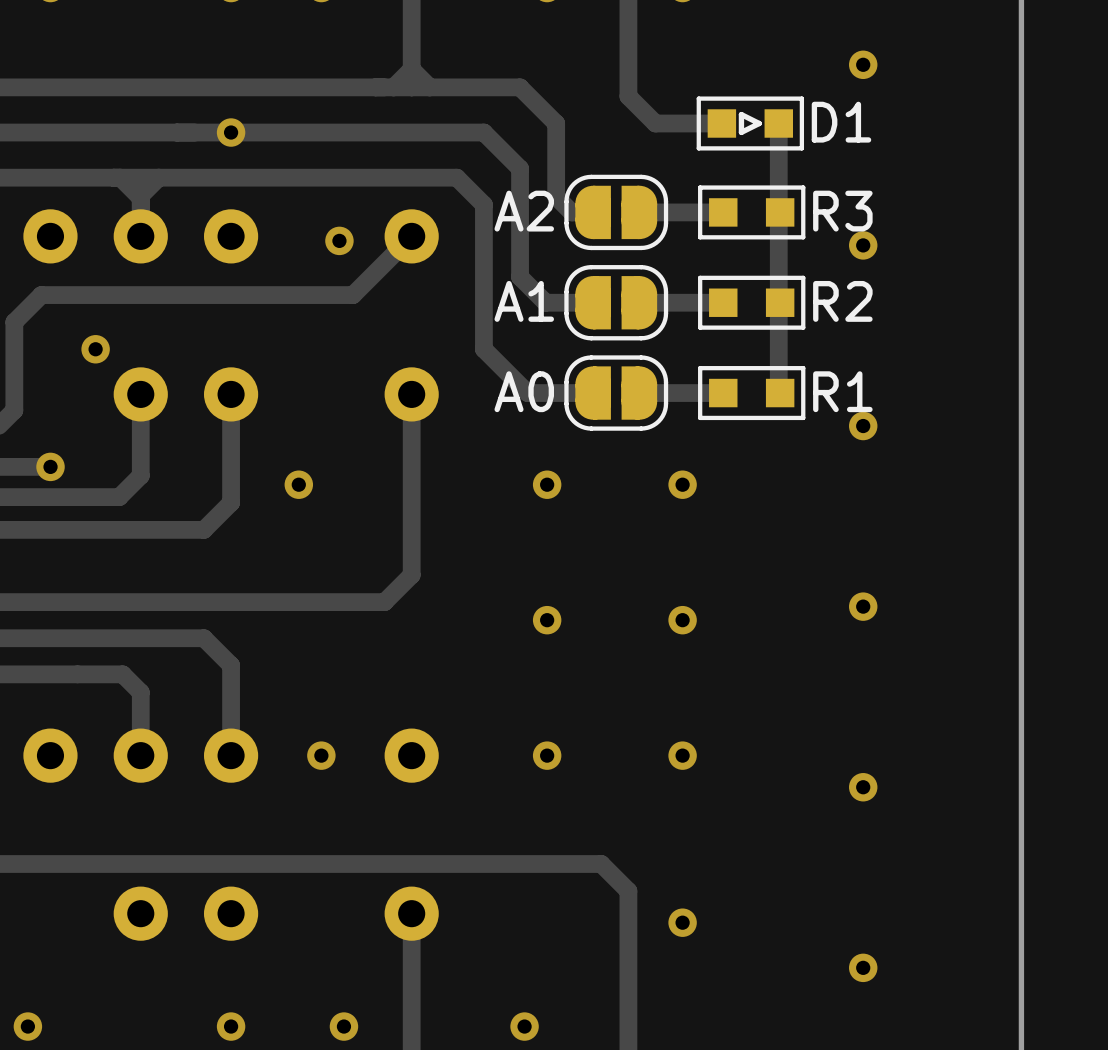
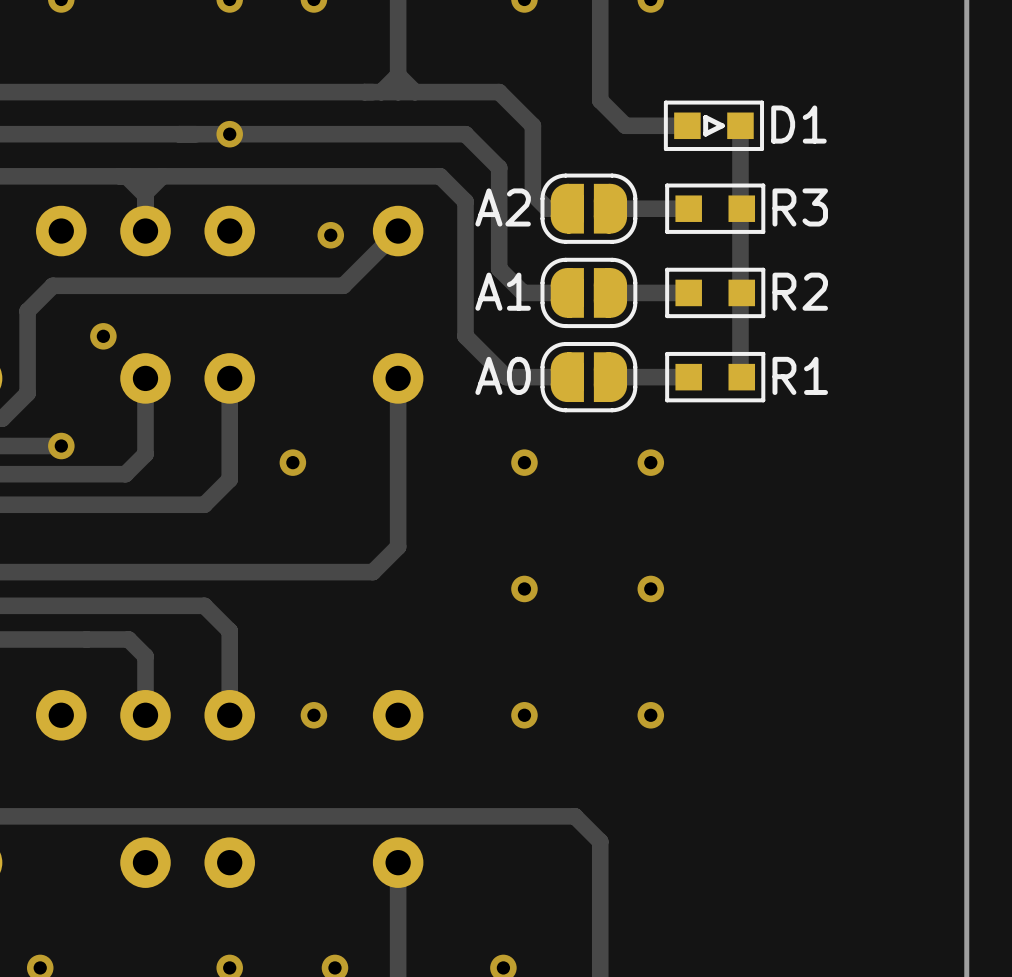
via: (863, 64) -> none
via: (863, 245) -> none
via: (863, 426) -> none
via: (863, 606) -> none
via: (863, 787) -> none
via: (682, 922) -> none
via: (863, 967) -> none

